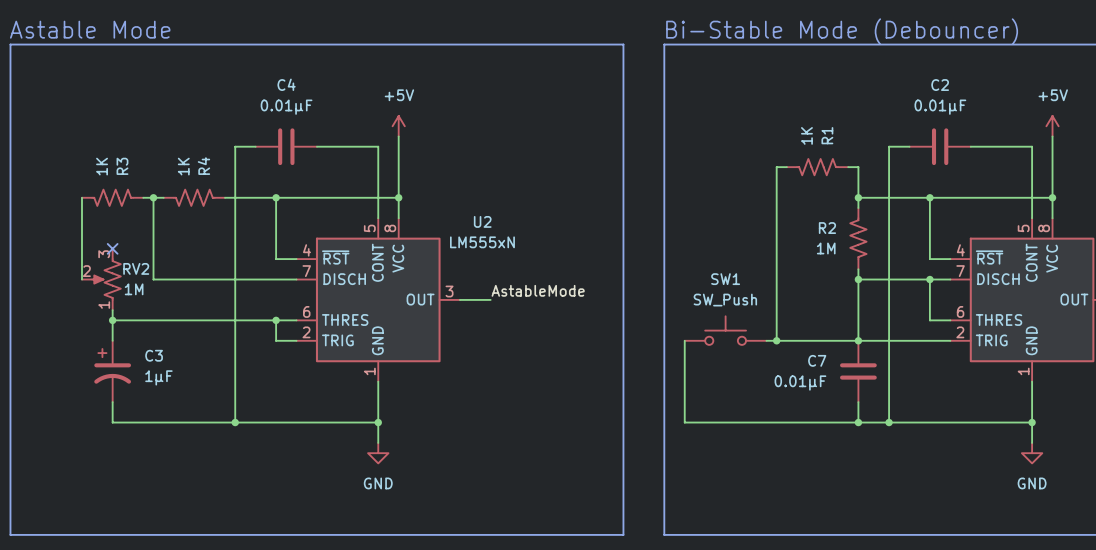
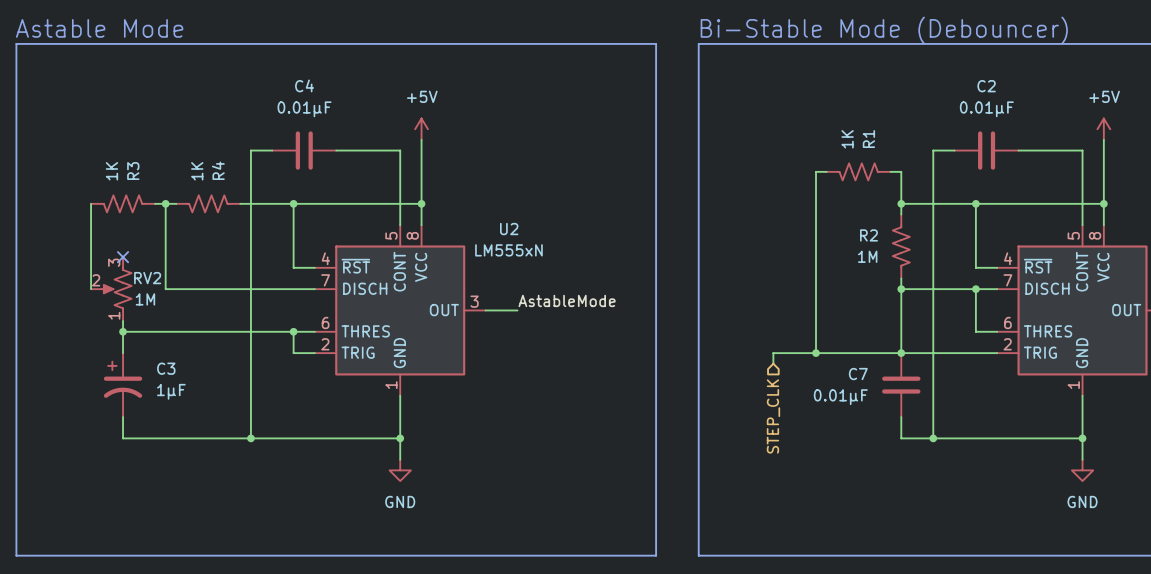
SW1: SW_Push (725, 330) -> none
wire: (684, 340) (684, 422) (858, 422) -> none
hierarchical label: none -> STEP_CLK (773, 416)
junction: (858, 422) -> none

